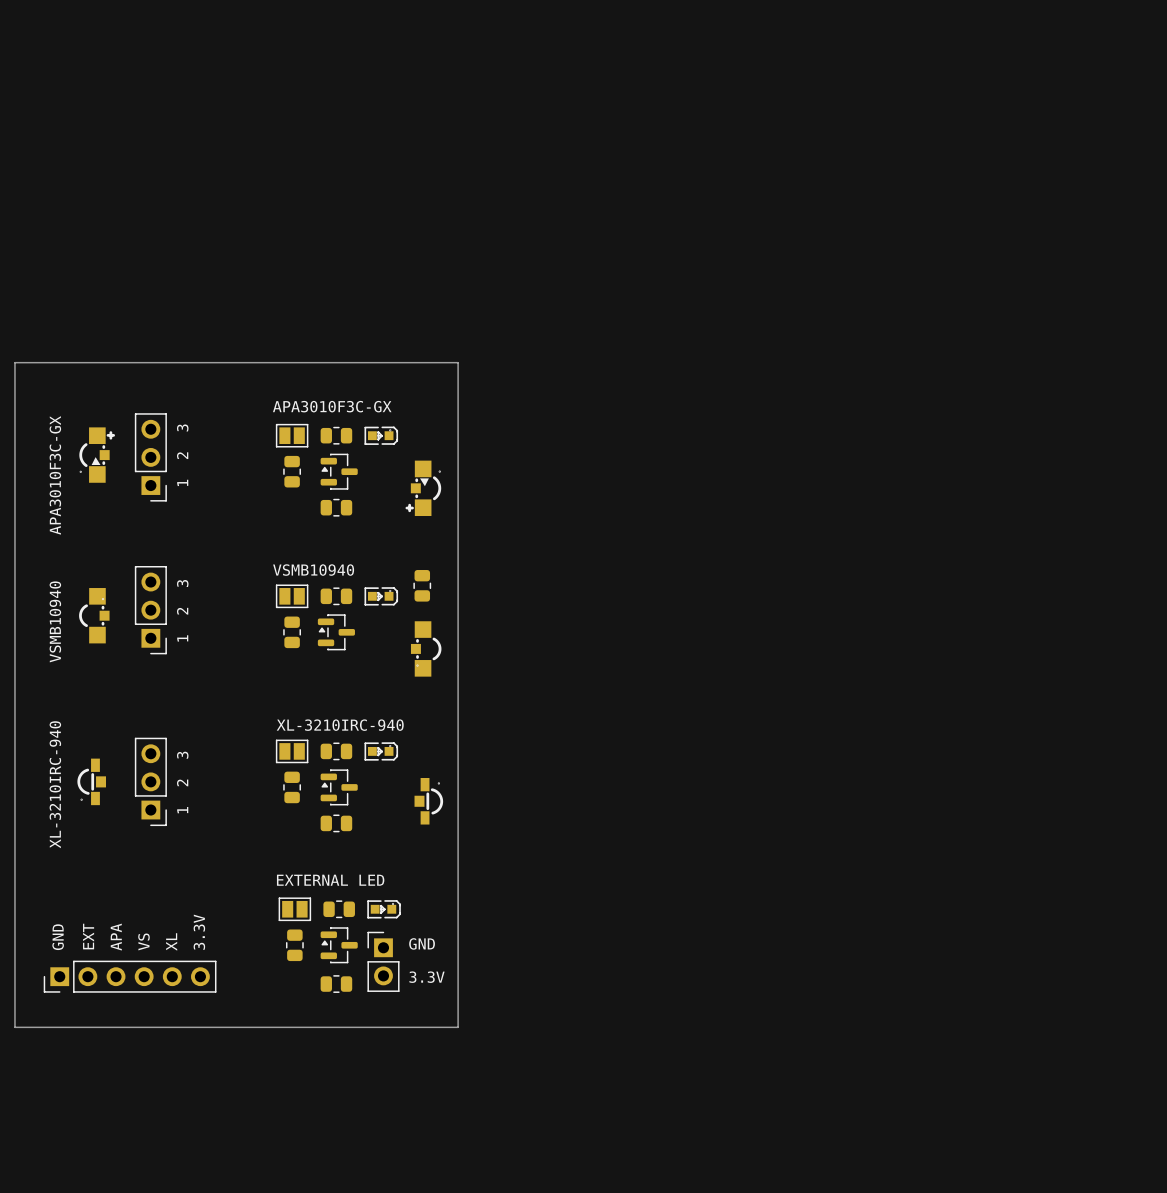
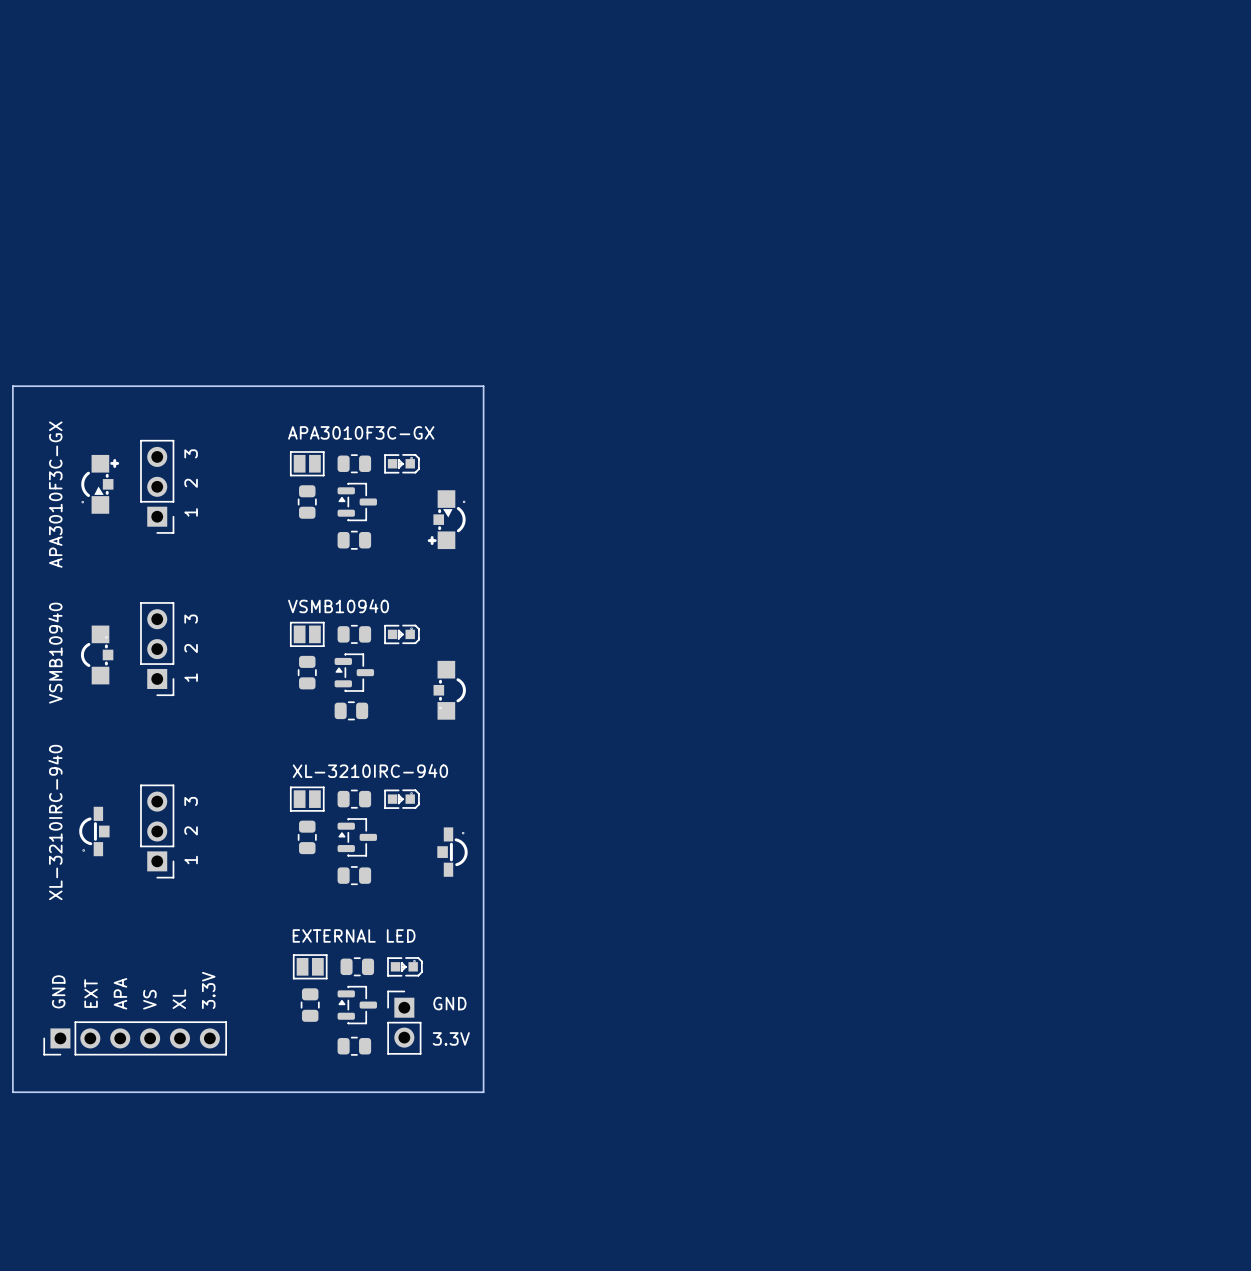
part rotation: 0° (422, 585) -> 90° clockwise (351, 710)
part position: (422, 585) -> (351, 710)

